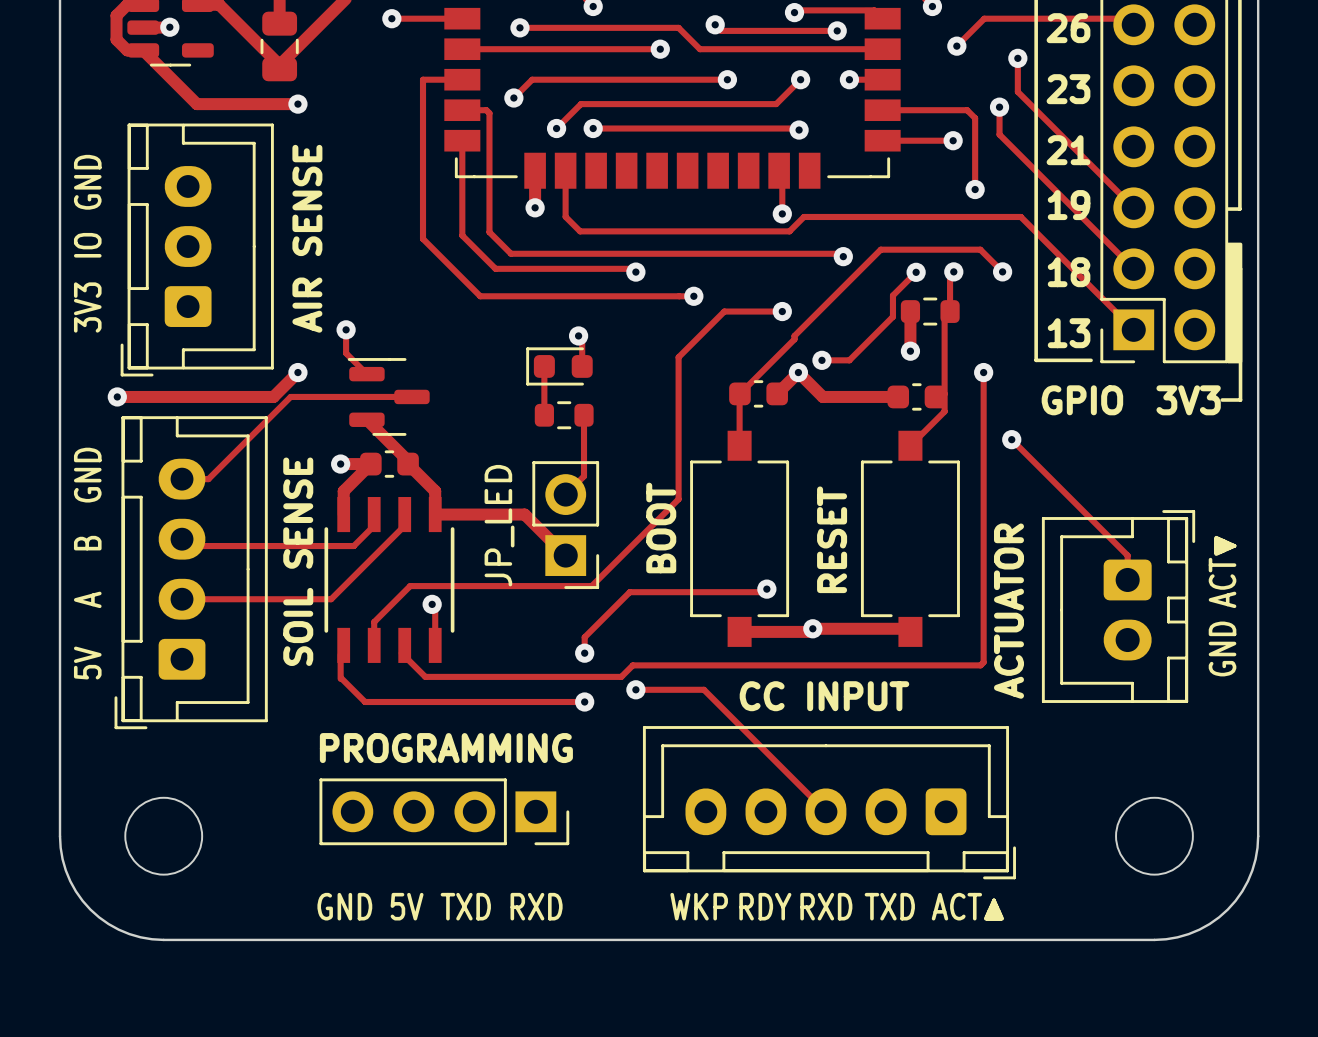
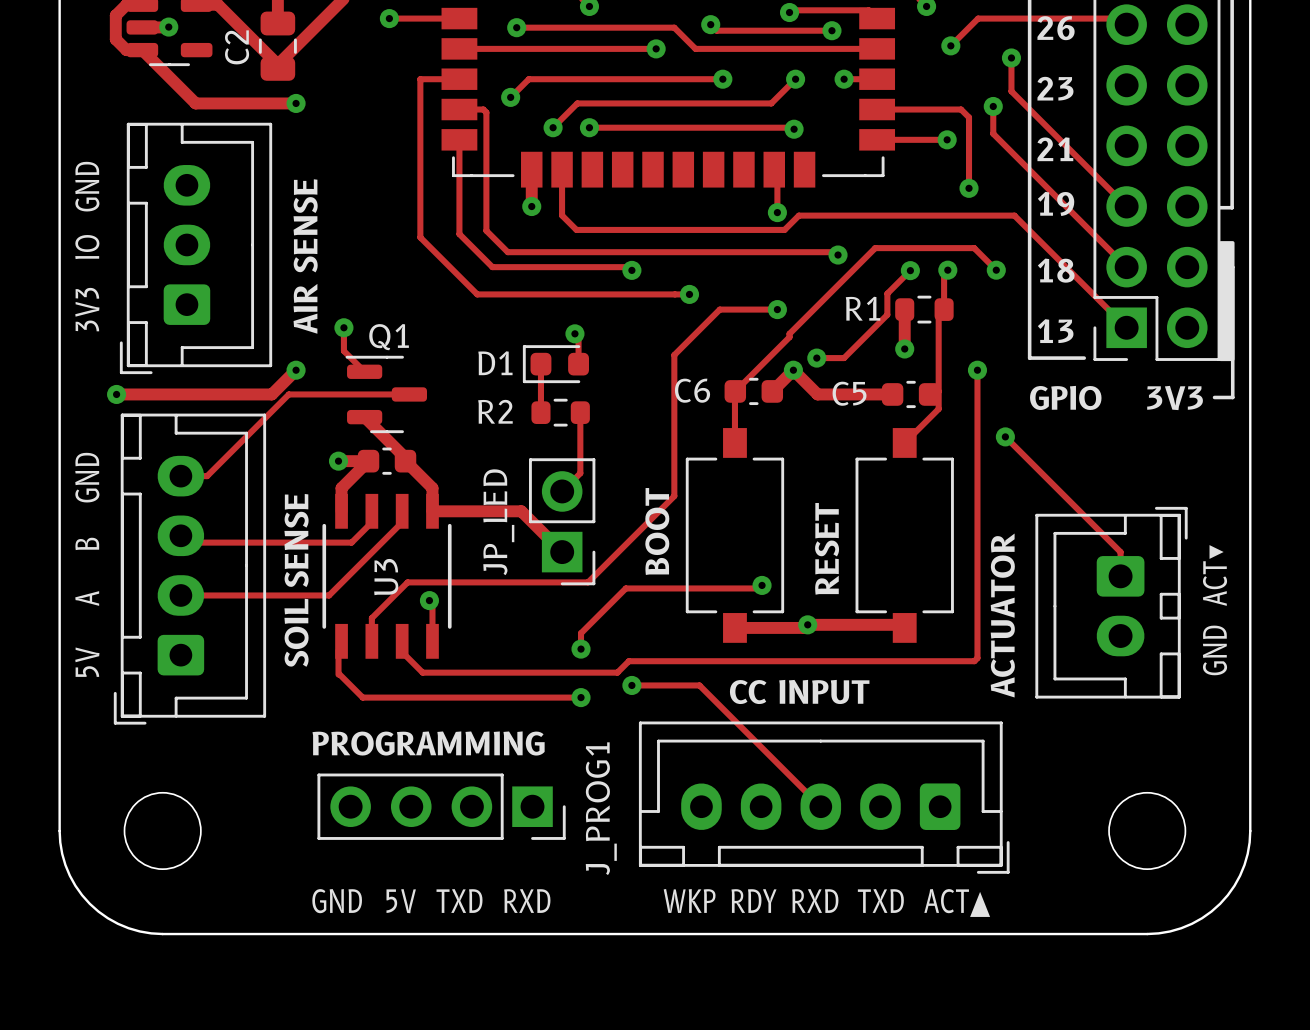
C2 name: none -> C2 (237, 47)
R1 name: none -> R1 (863, 308)
Q1 name: none -> Q1 (389, 337)
D1 name: none -> D1 (495, 363)
C6 name: none -> C6 (692, 390)
C5 name: none -> C5 (849, 393)
R2 name: none -> R2 (495, 411)
U3 name: none -> U3 (386, 577)
J_PROG1 name: none -> J_PROG1 (601, 808)

